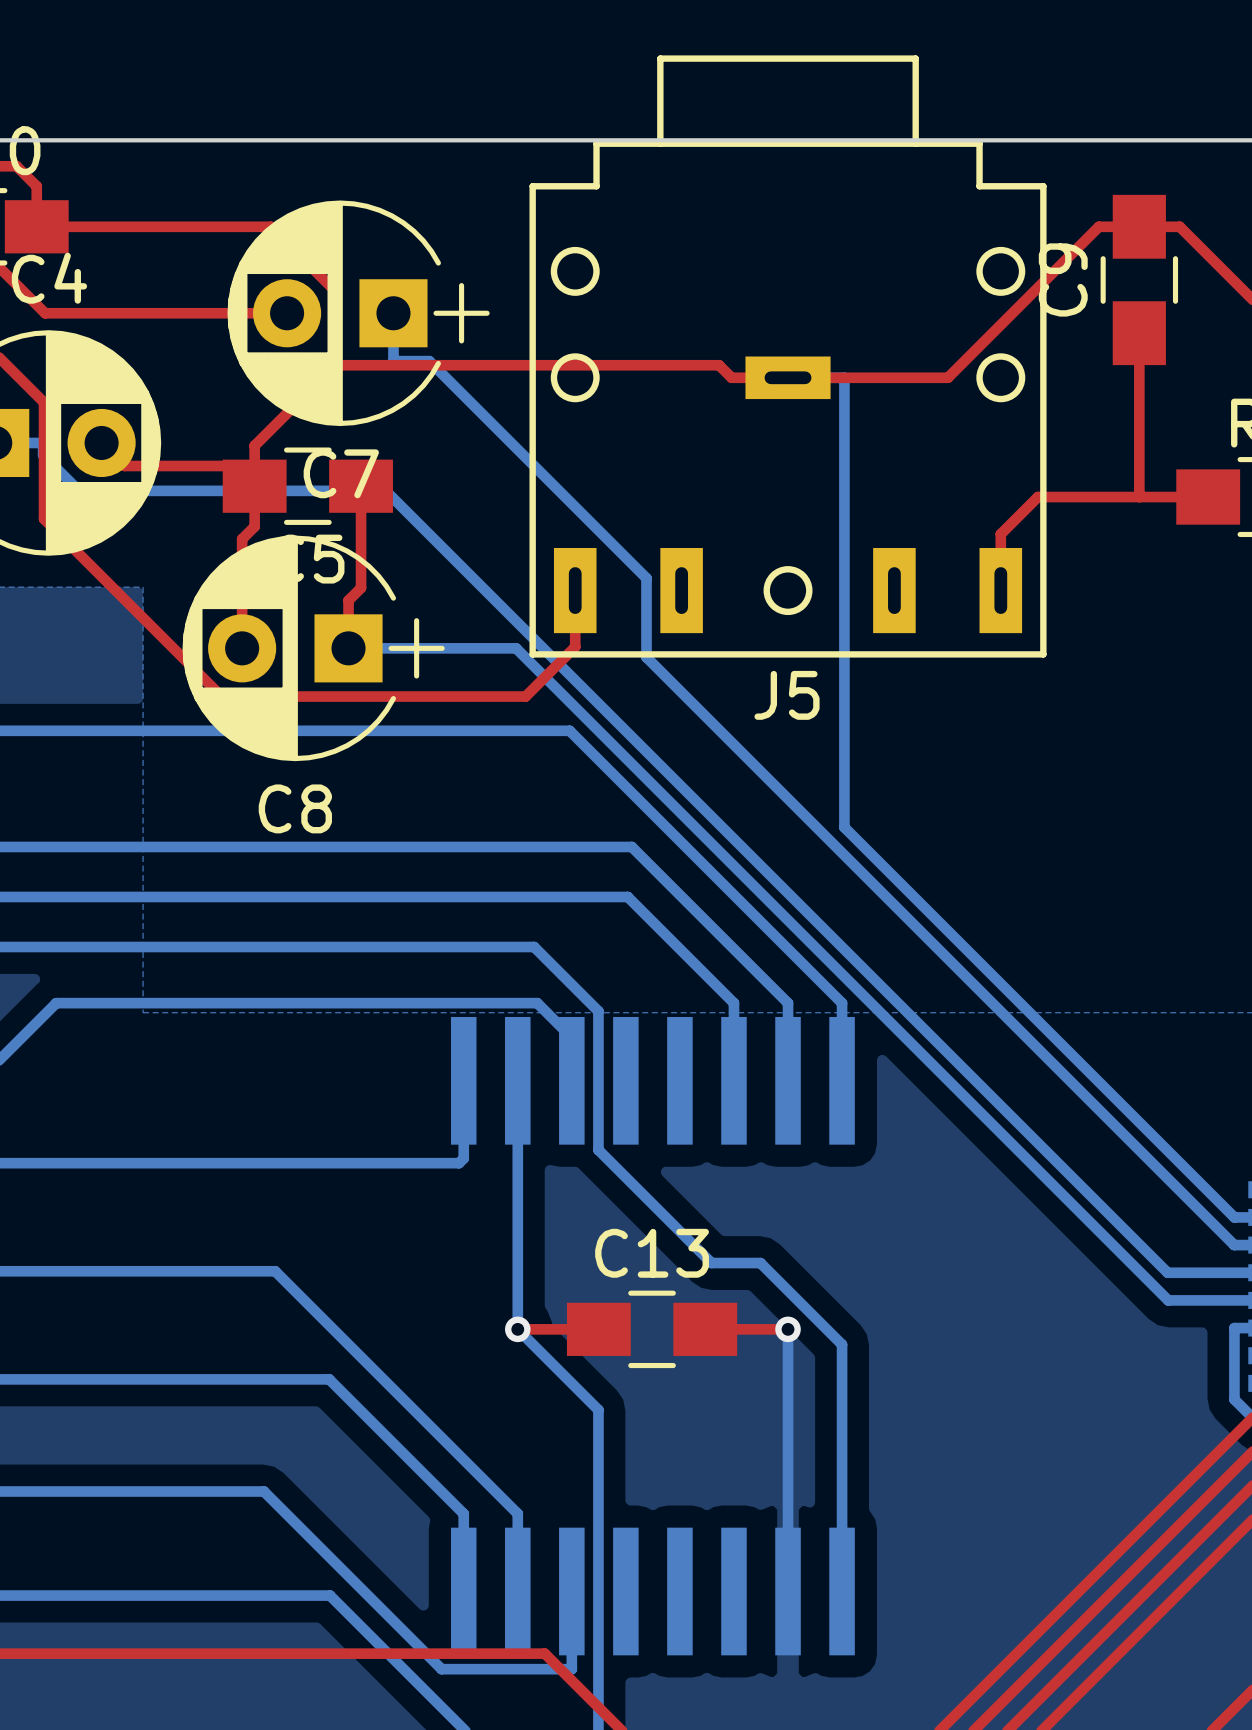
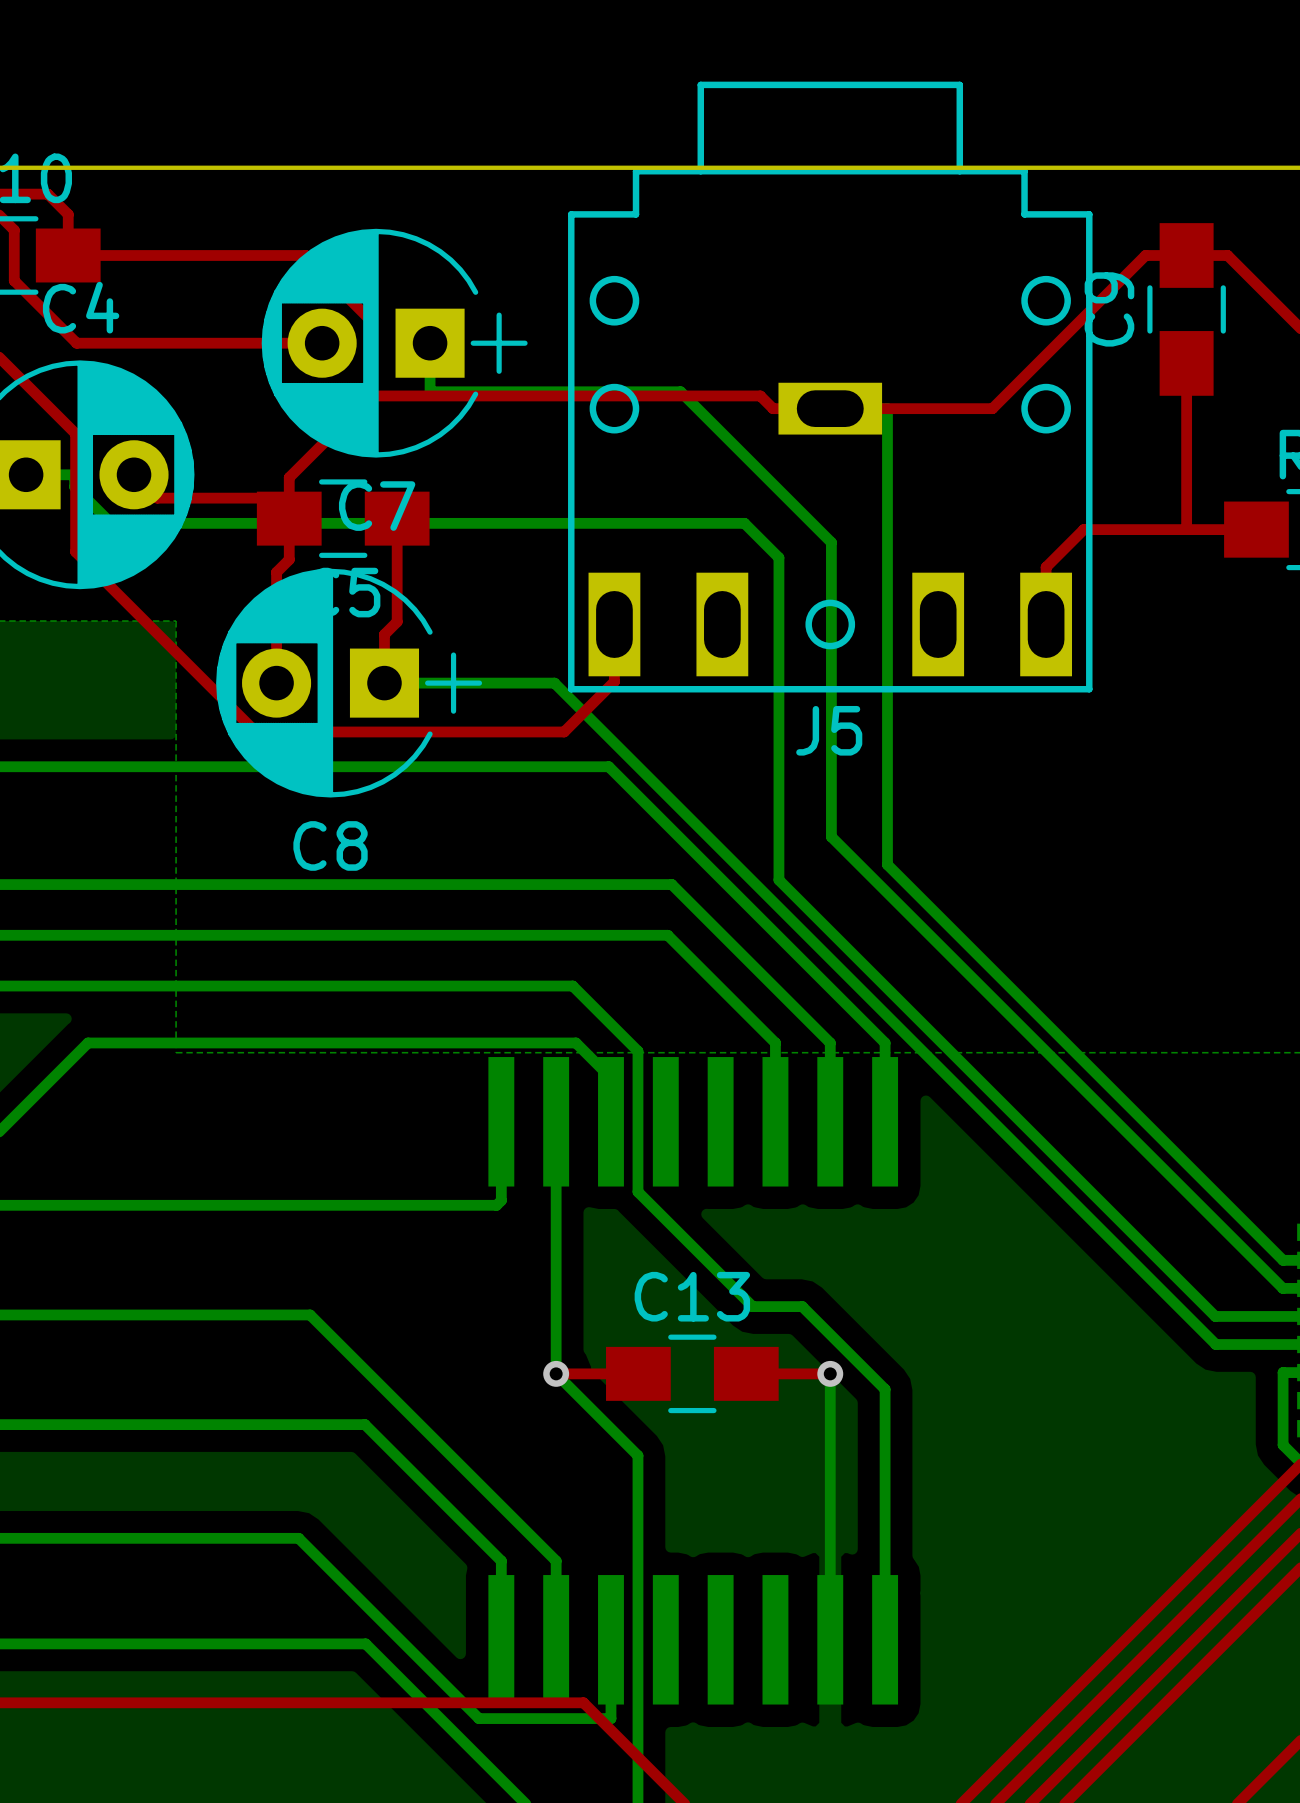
J5 footprint: [529, 55, 1047, 658] -> [568, 81, 1093, 693]
bottom track: (429, 361) (646, 578) (646, 657) (789, 799) -> (466, 391) (680, 391) (831, 542) (831, 836)
bottom track: (385, 490) (737, 842) -> (422, 523) (744, 523) (778, 557) (778, 880)

